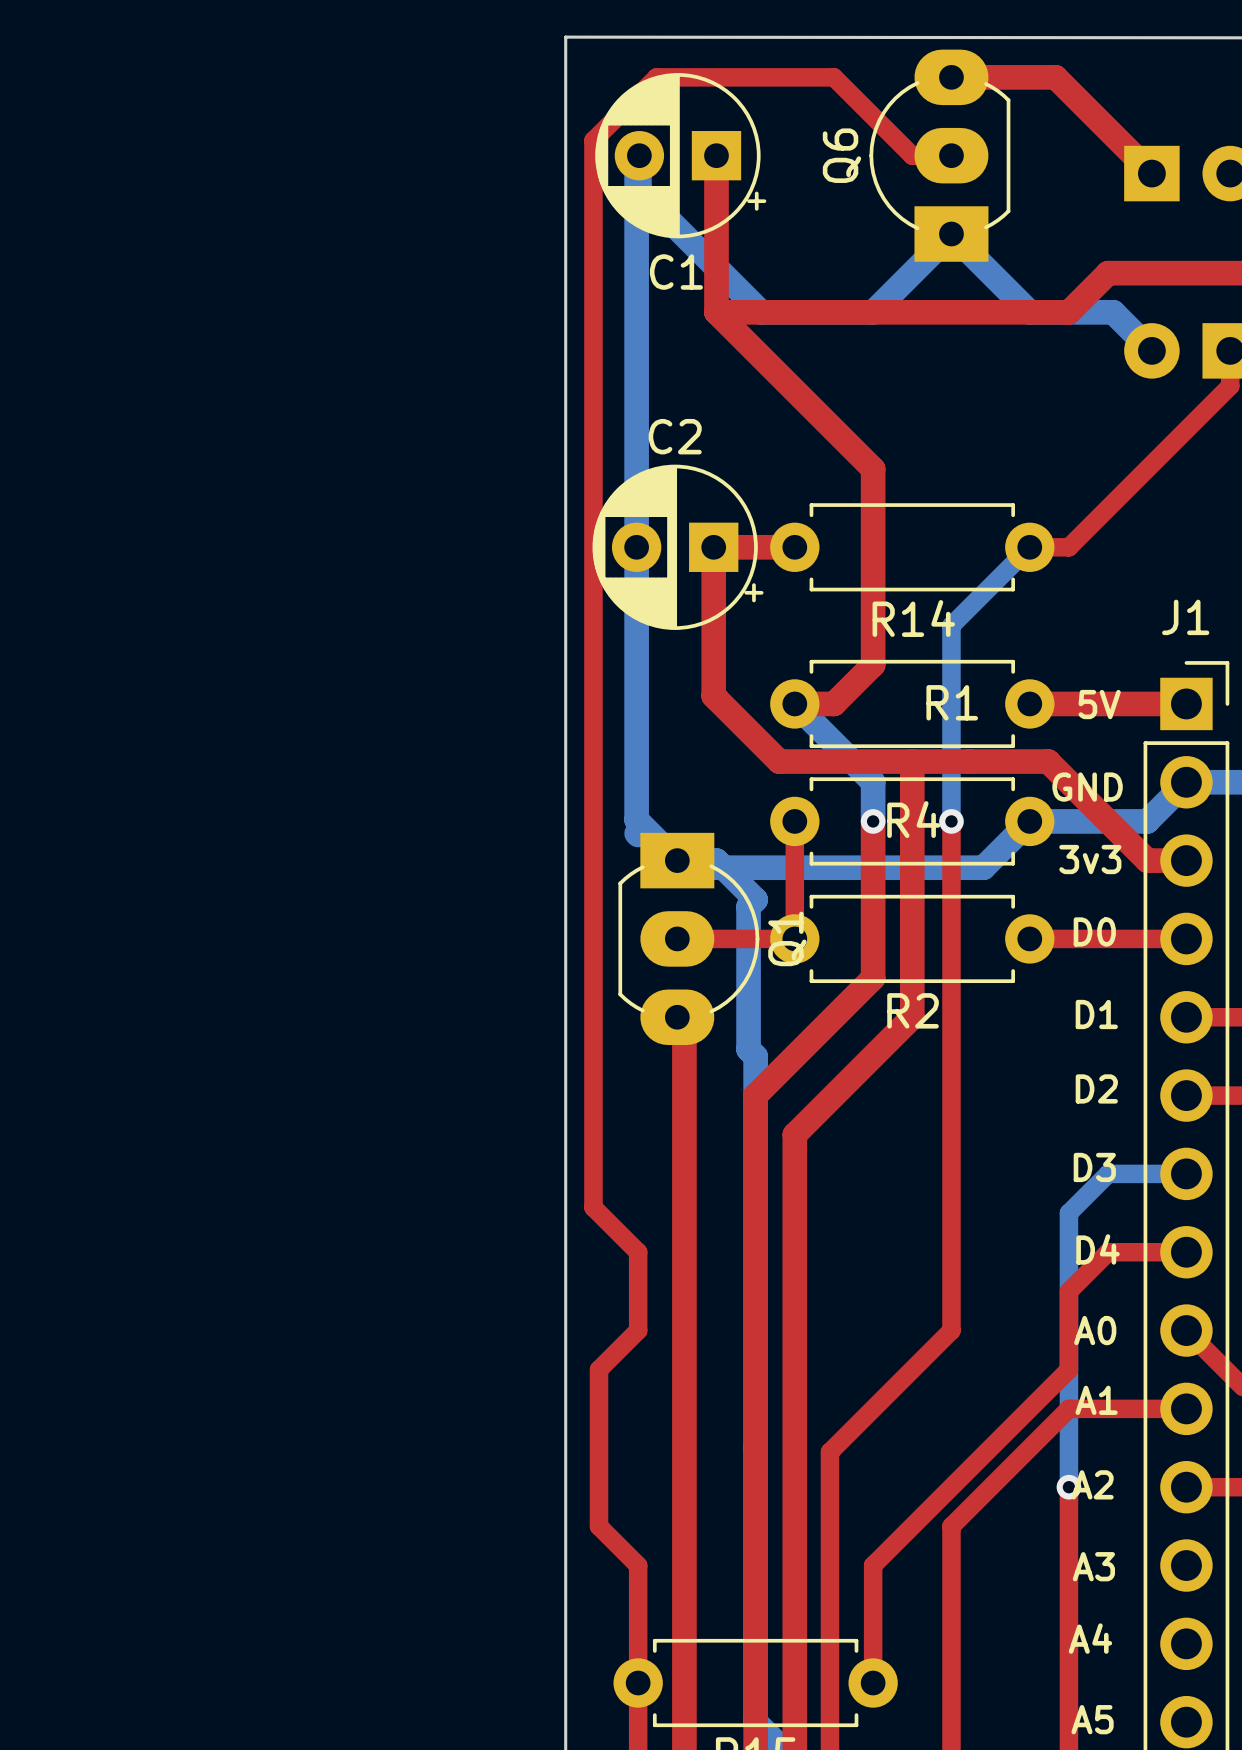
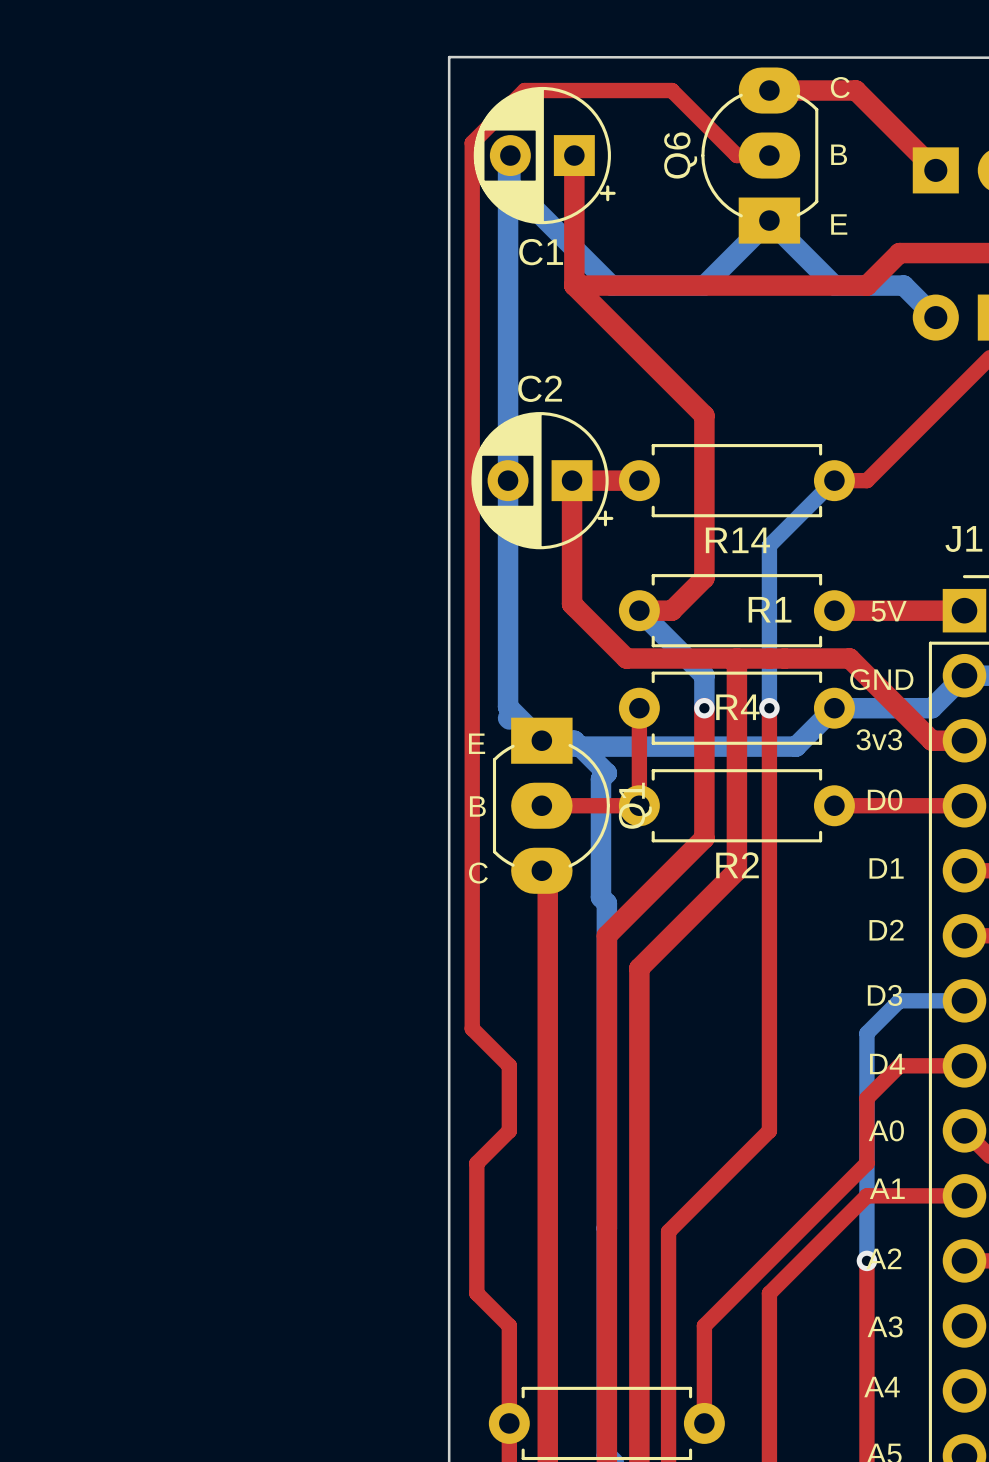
text: none -> C (840, 87)
text: none -> B (839, 154)
text: none -> E (839, 224)
text: none -> E (477, 743)
text: none -> B (477, 806)
text: none -> C (478, 873)

